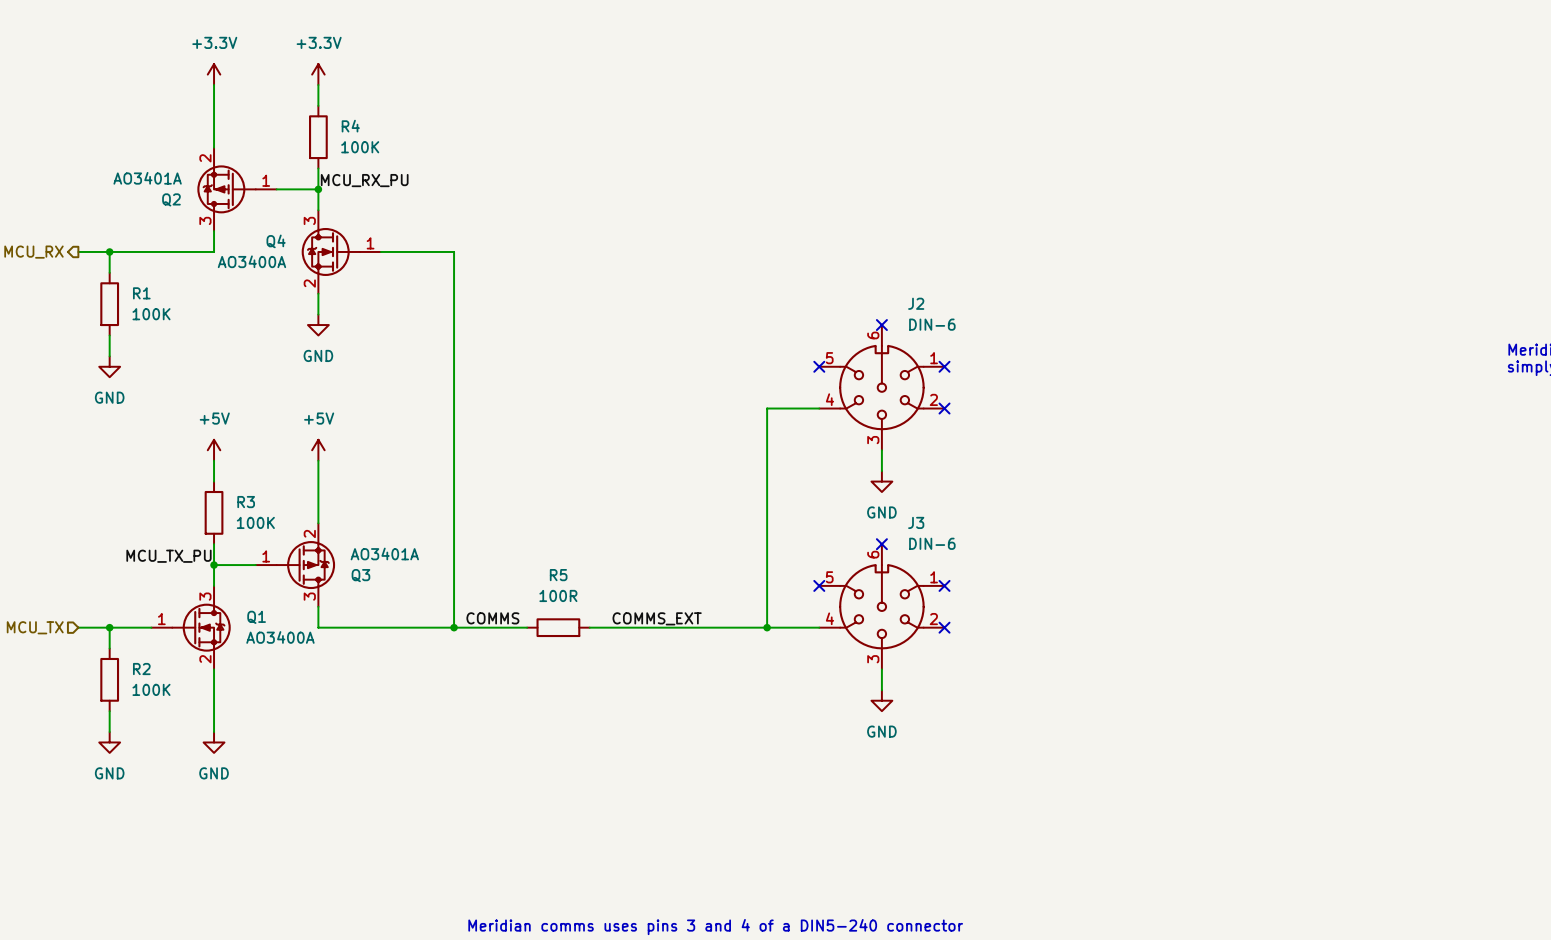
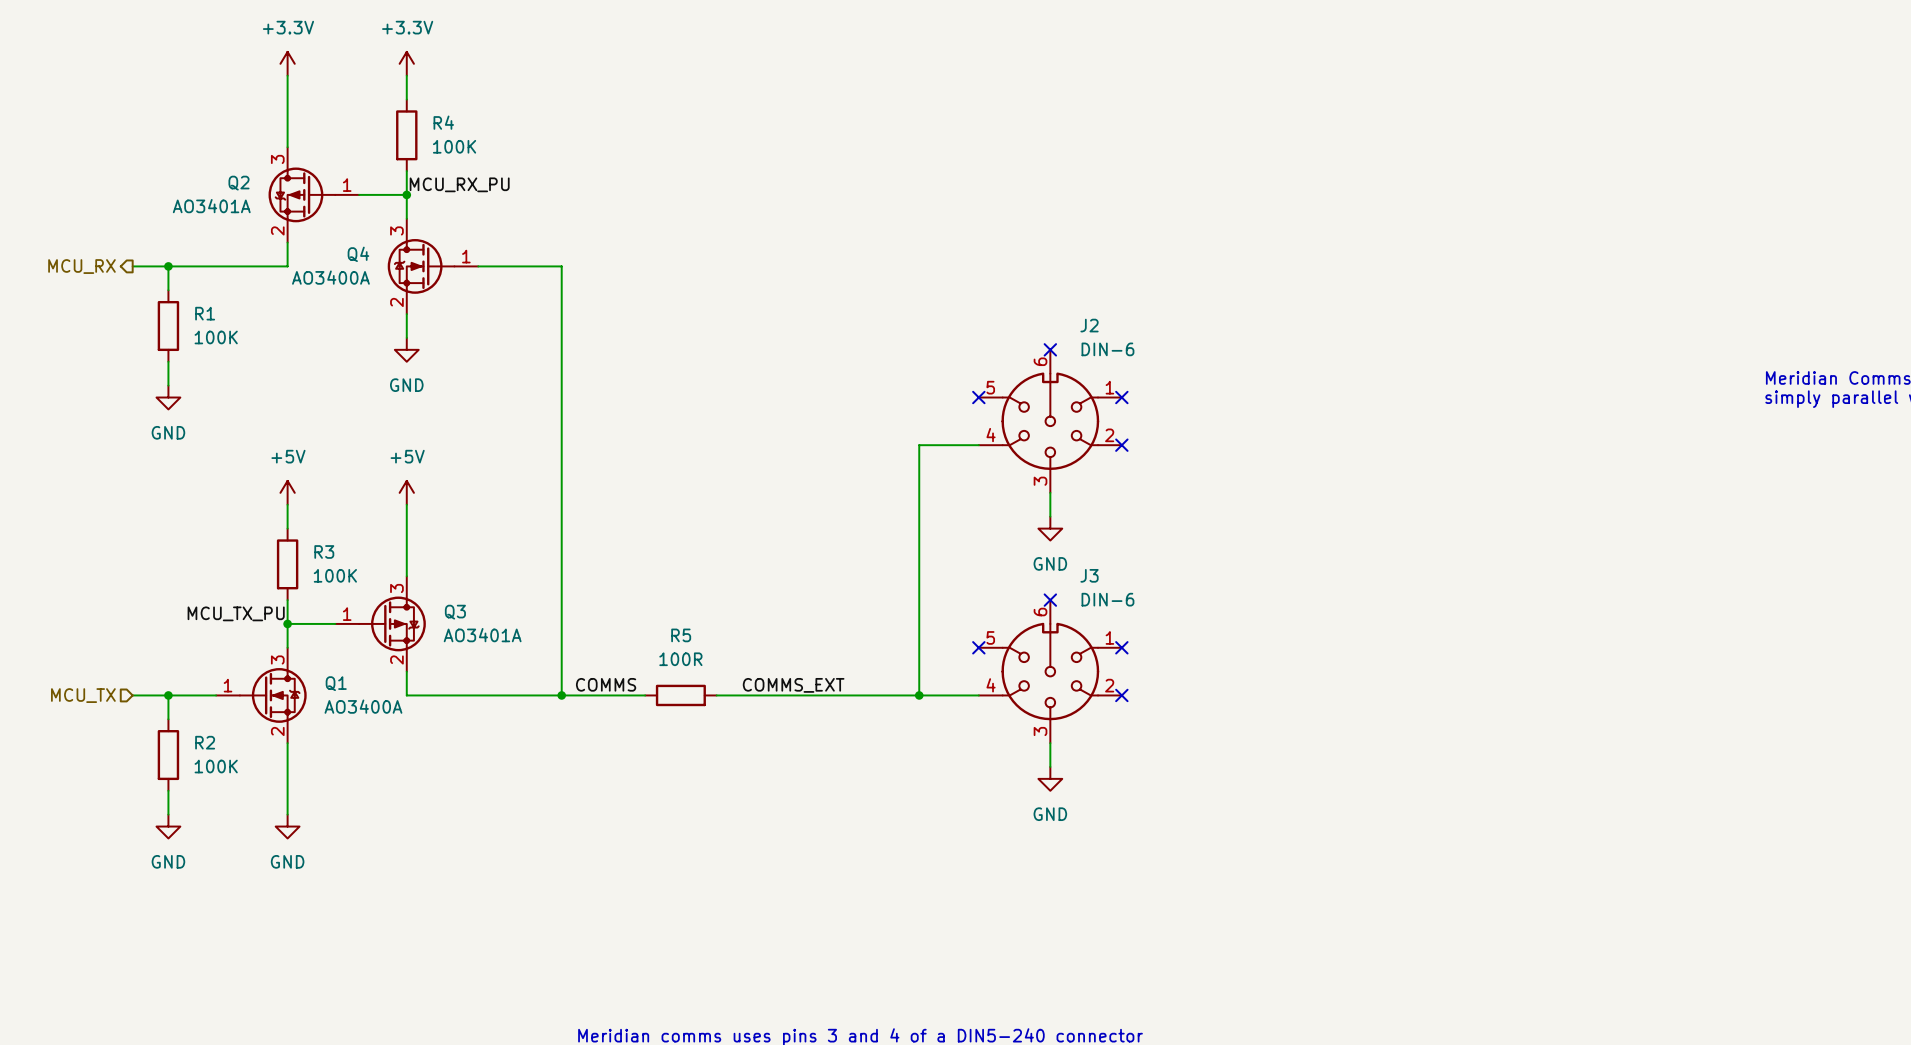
Q2 flip: as is (226, 189) -> up-down (301, 194)
Q3 flip: as is (305, 565) -> up-down (392, 623)

